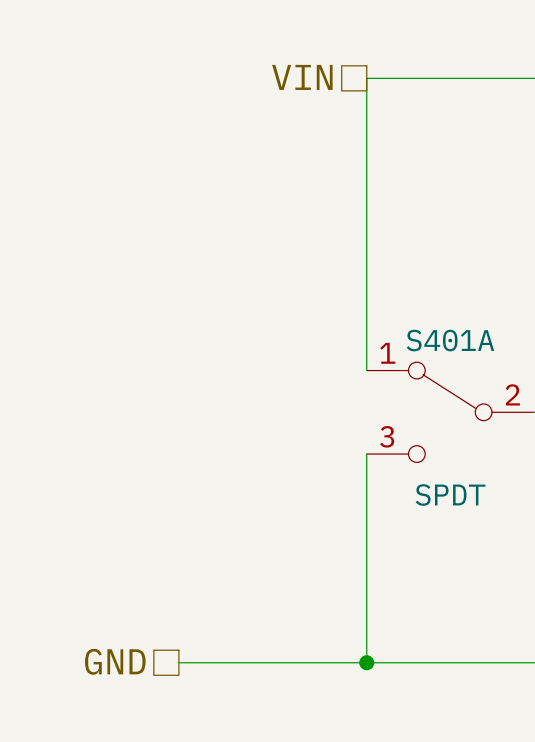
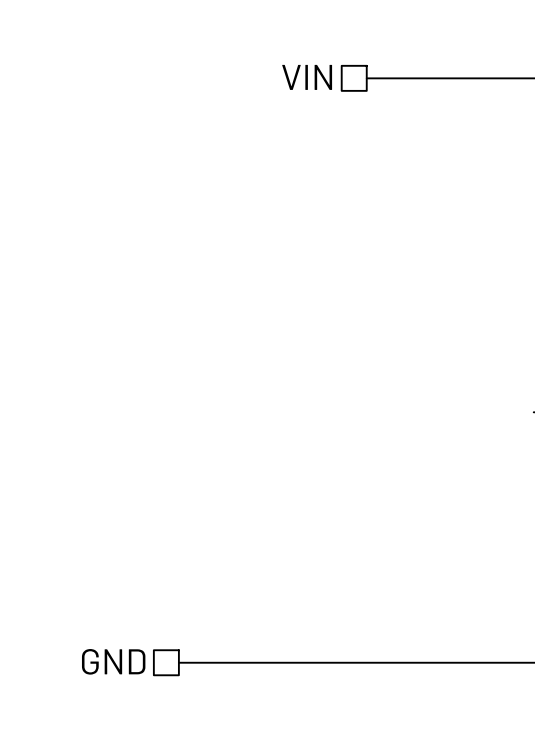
wire: (366, 78) (366, 370) -> none
S401A: SPDT (450, 412) -> none
wire: (366, 454) (366, 662) -> none
junction: (366, 662) -> none

